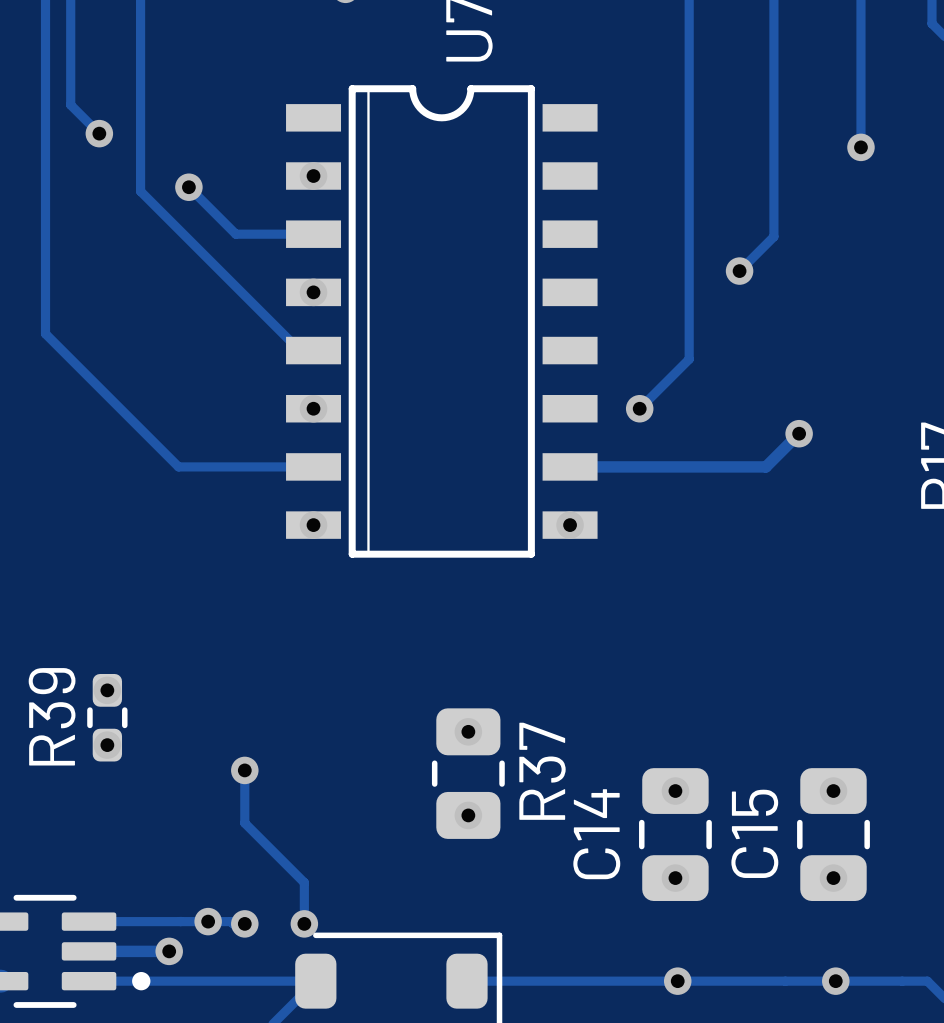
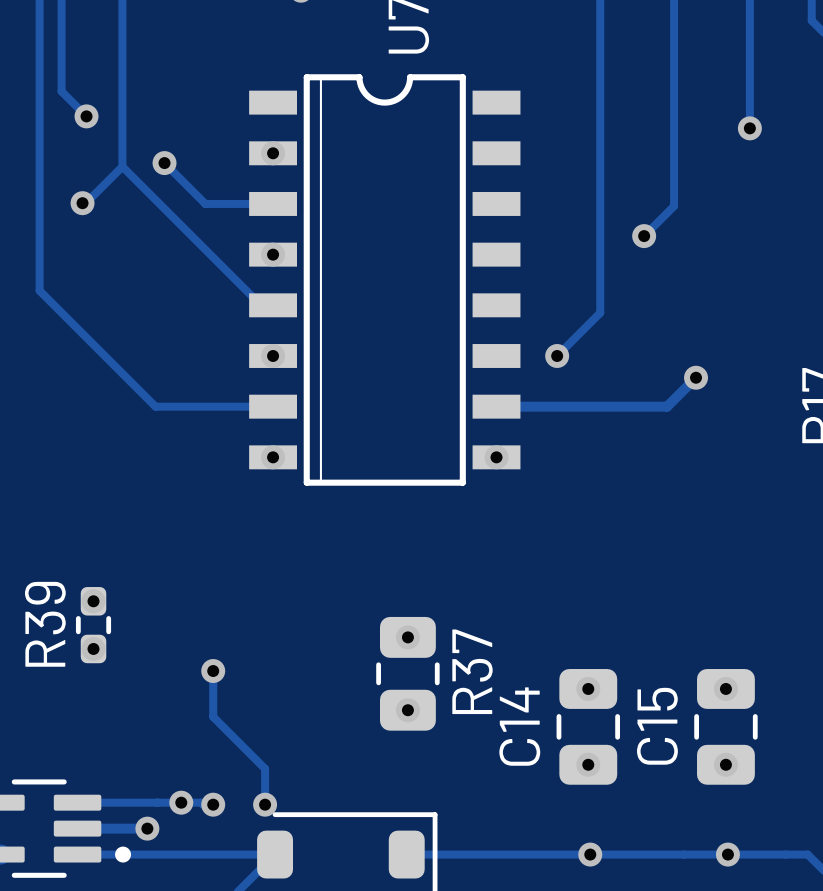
track: none -> (122, 166) (85, 203) (82, 203)
via: none -> (82, 203)

